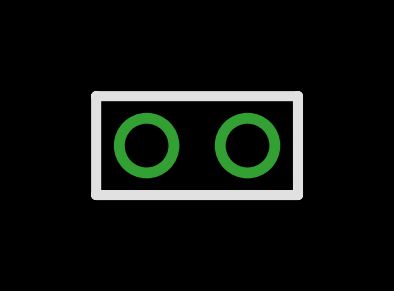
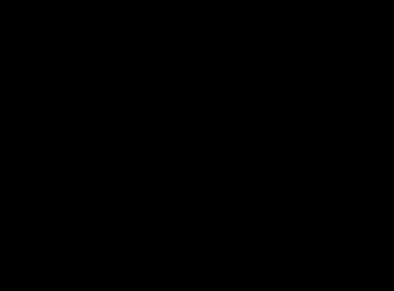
part: (197, 145) -> none

